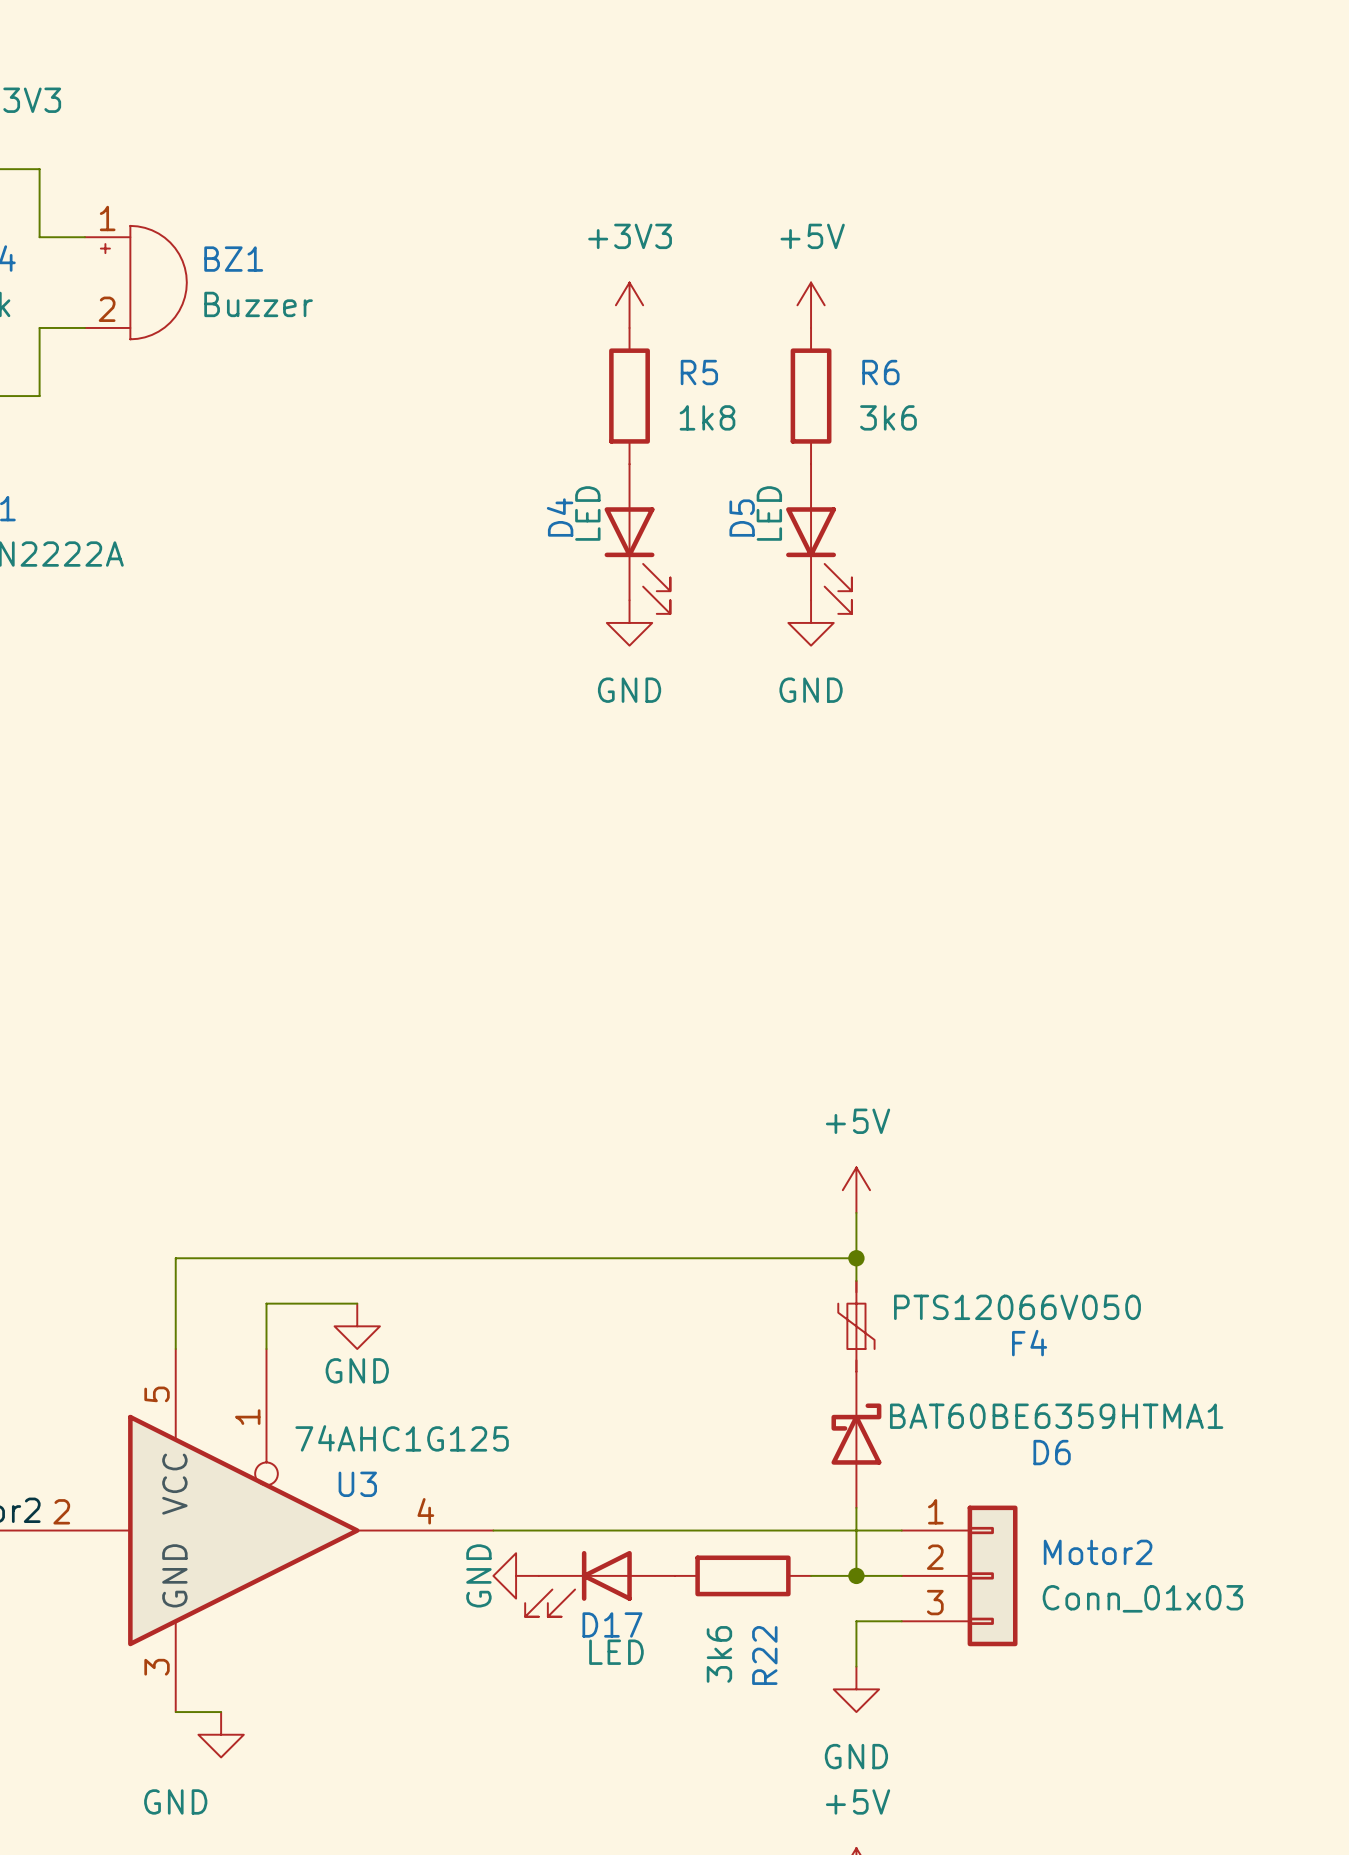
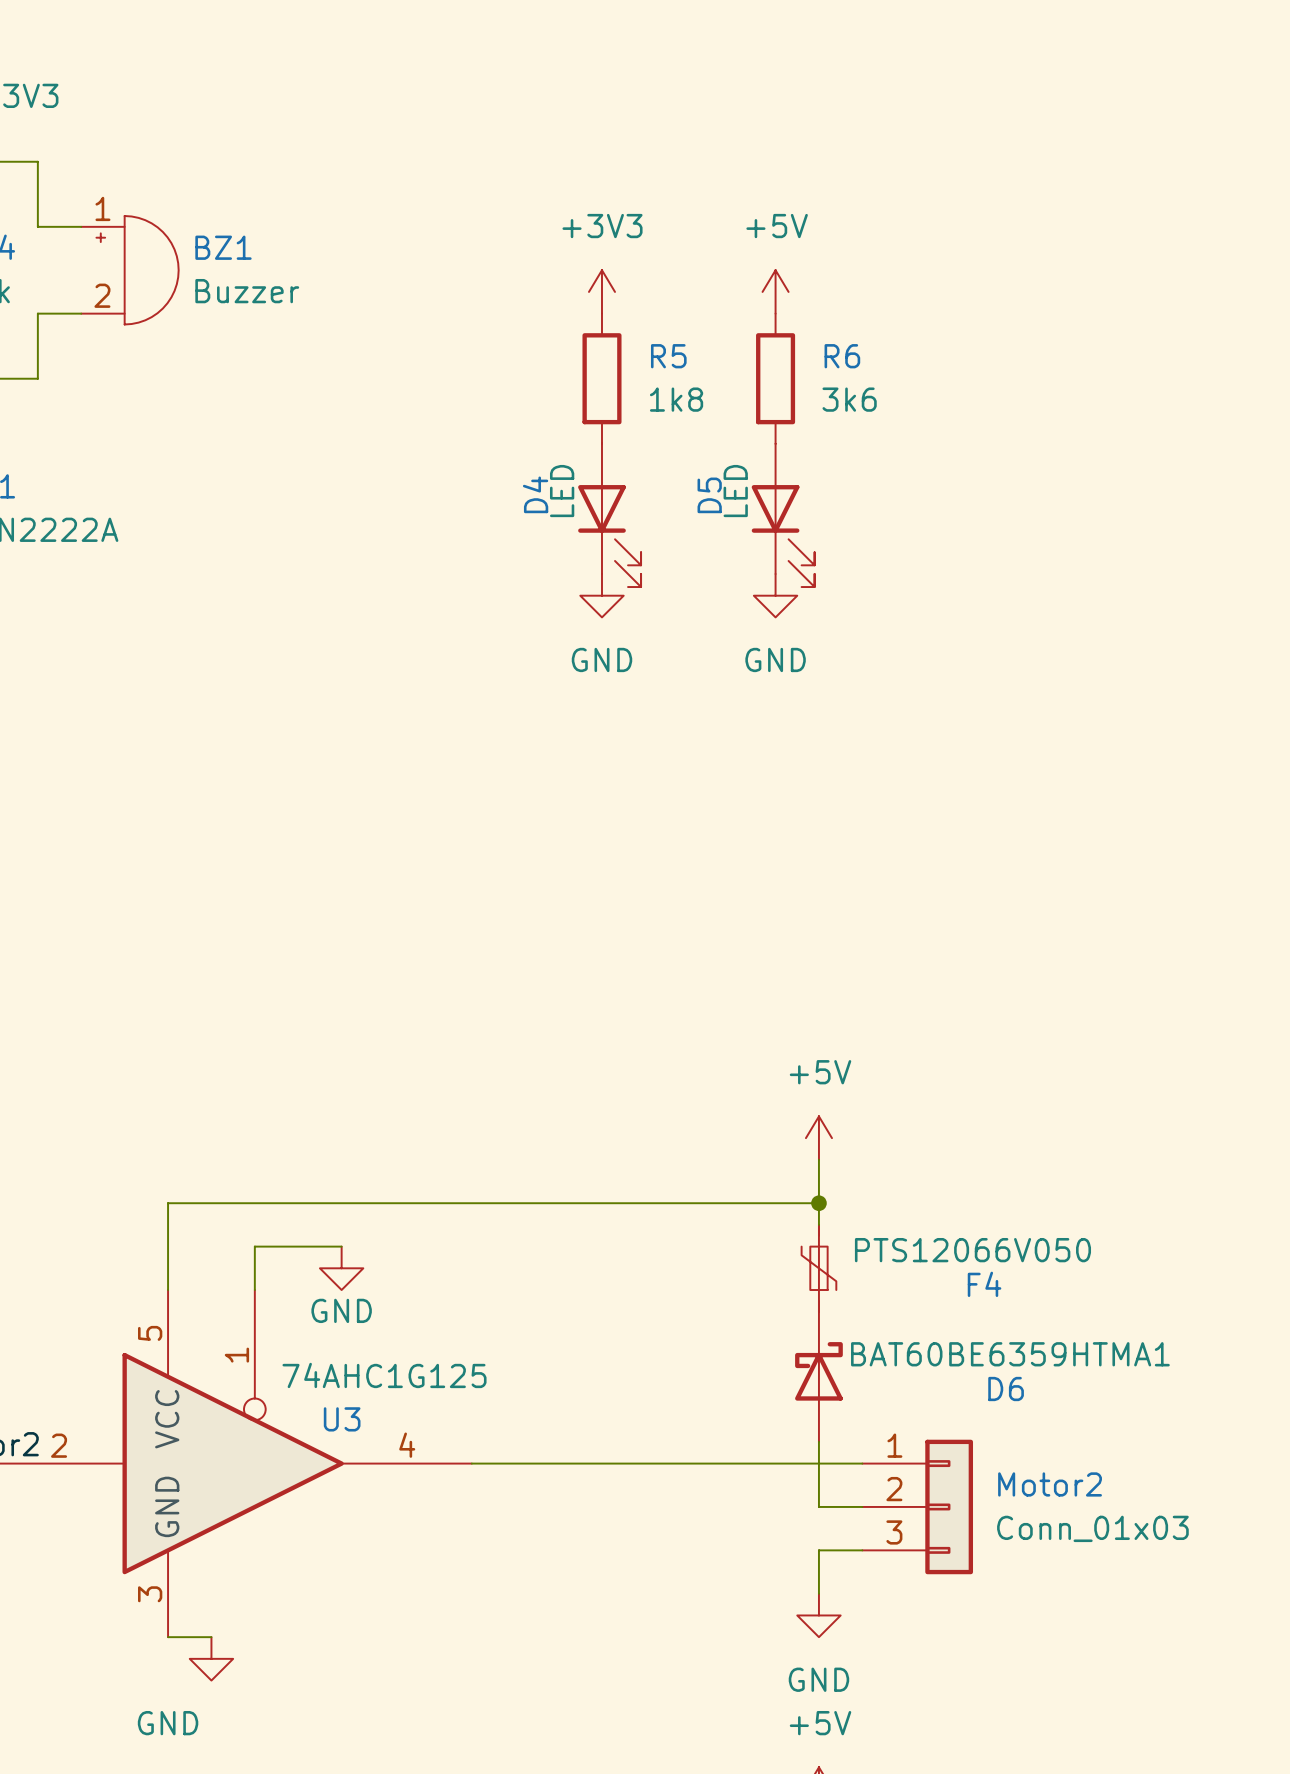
power symbol: GND (516, 1575) -> none
R22: 3k6 (742, 1575) -> none
wire: (811, 1575) (856, 1575) -> none
junction: (856, 1575) -> none
D17: LED (600, 1583) -> none

